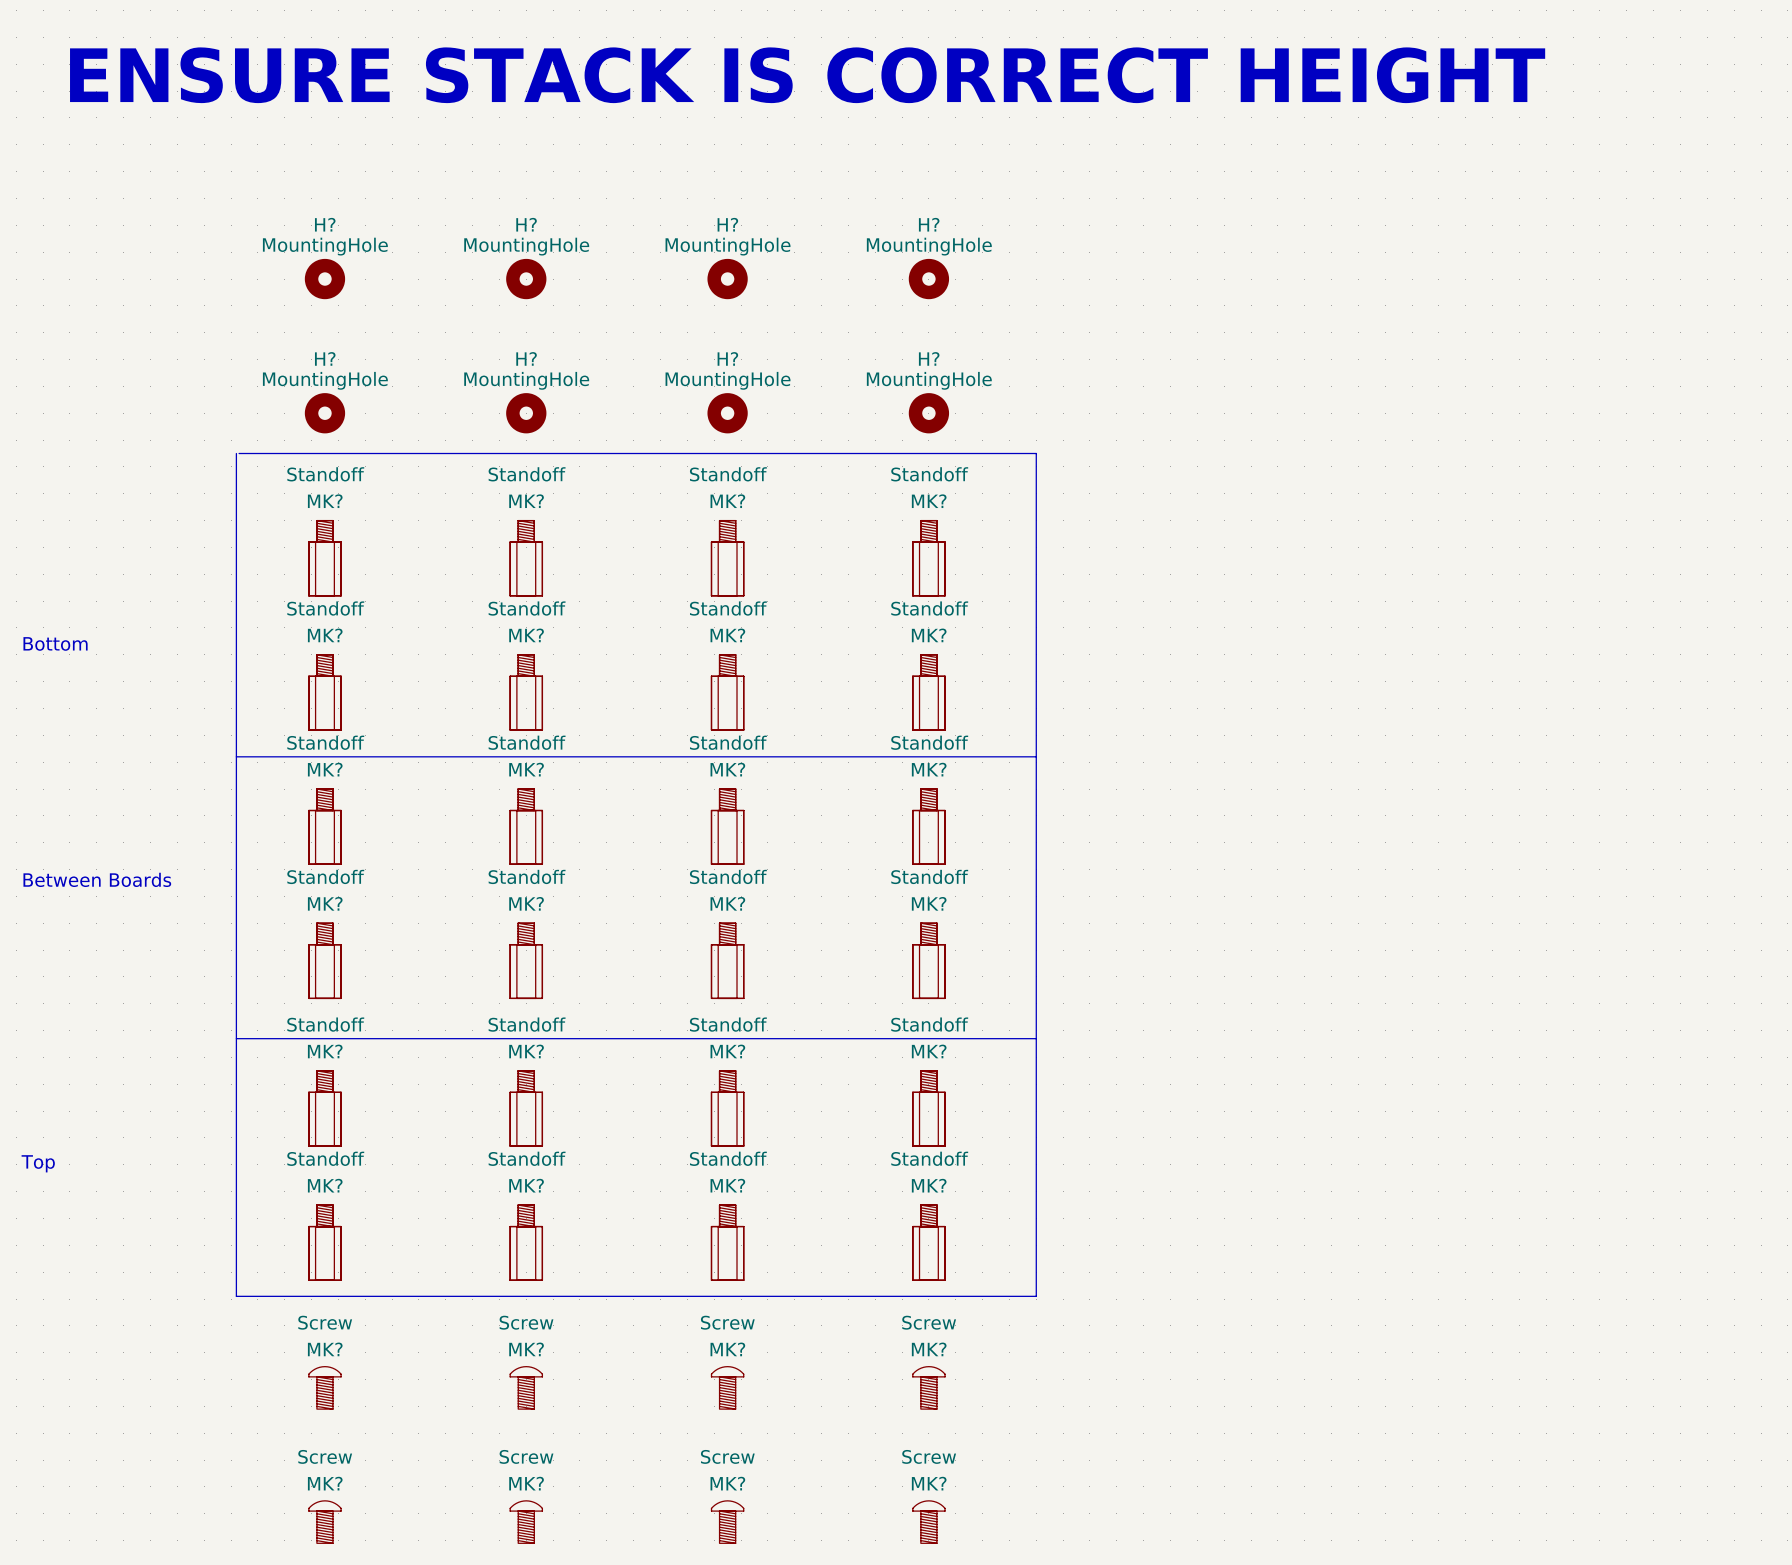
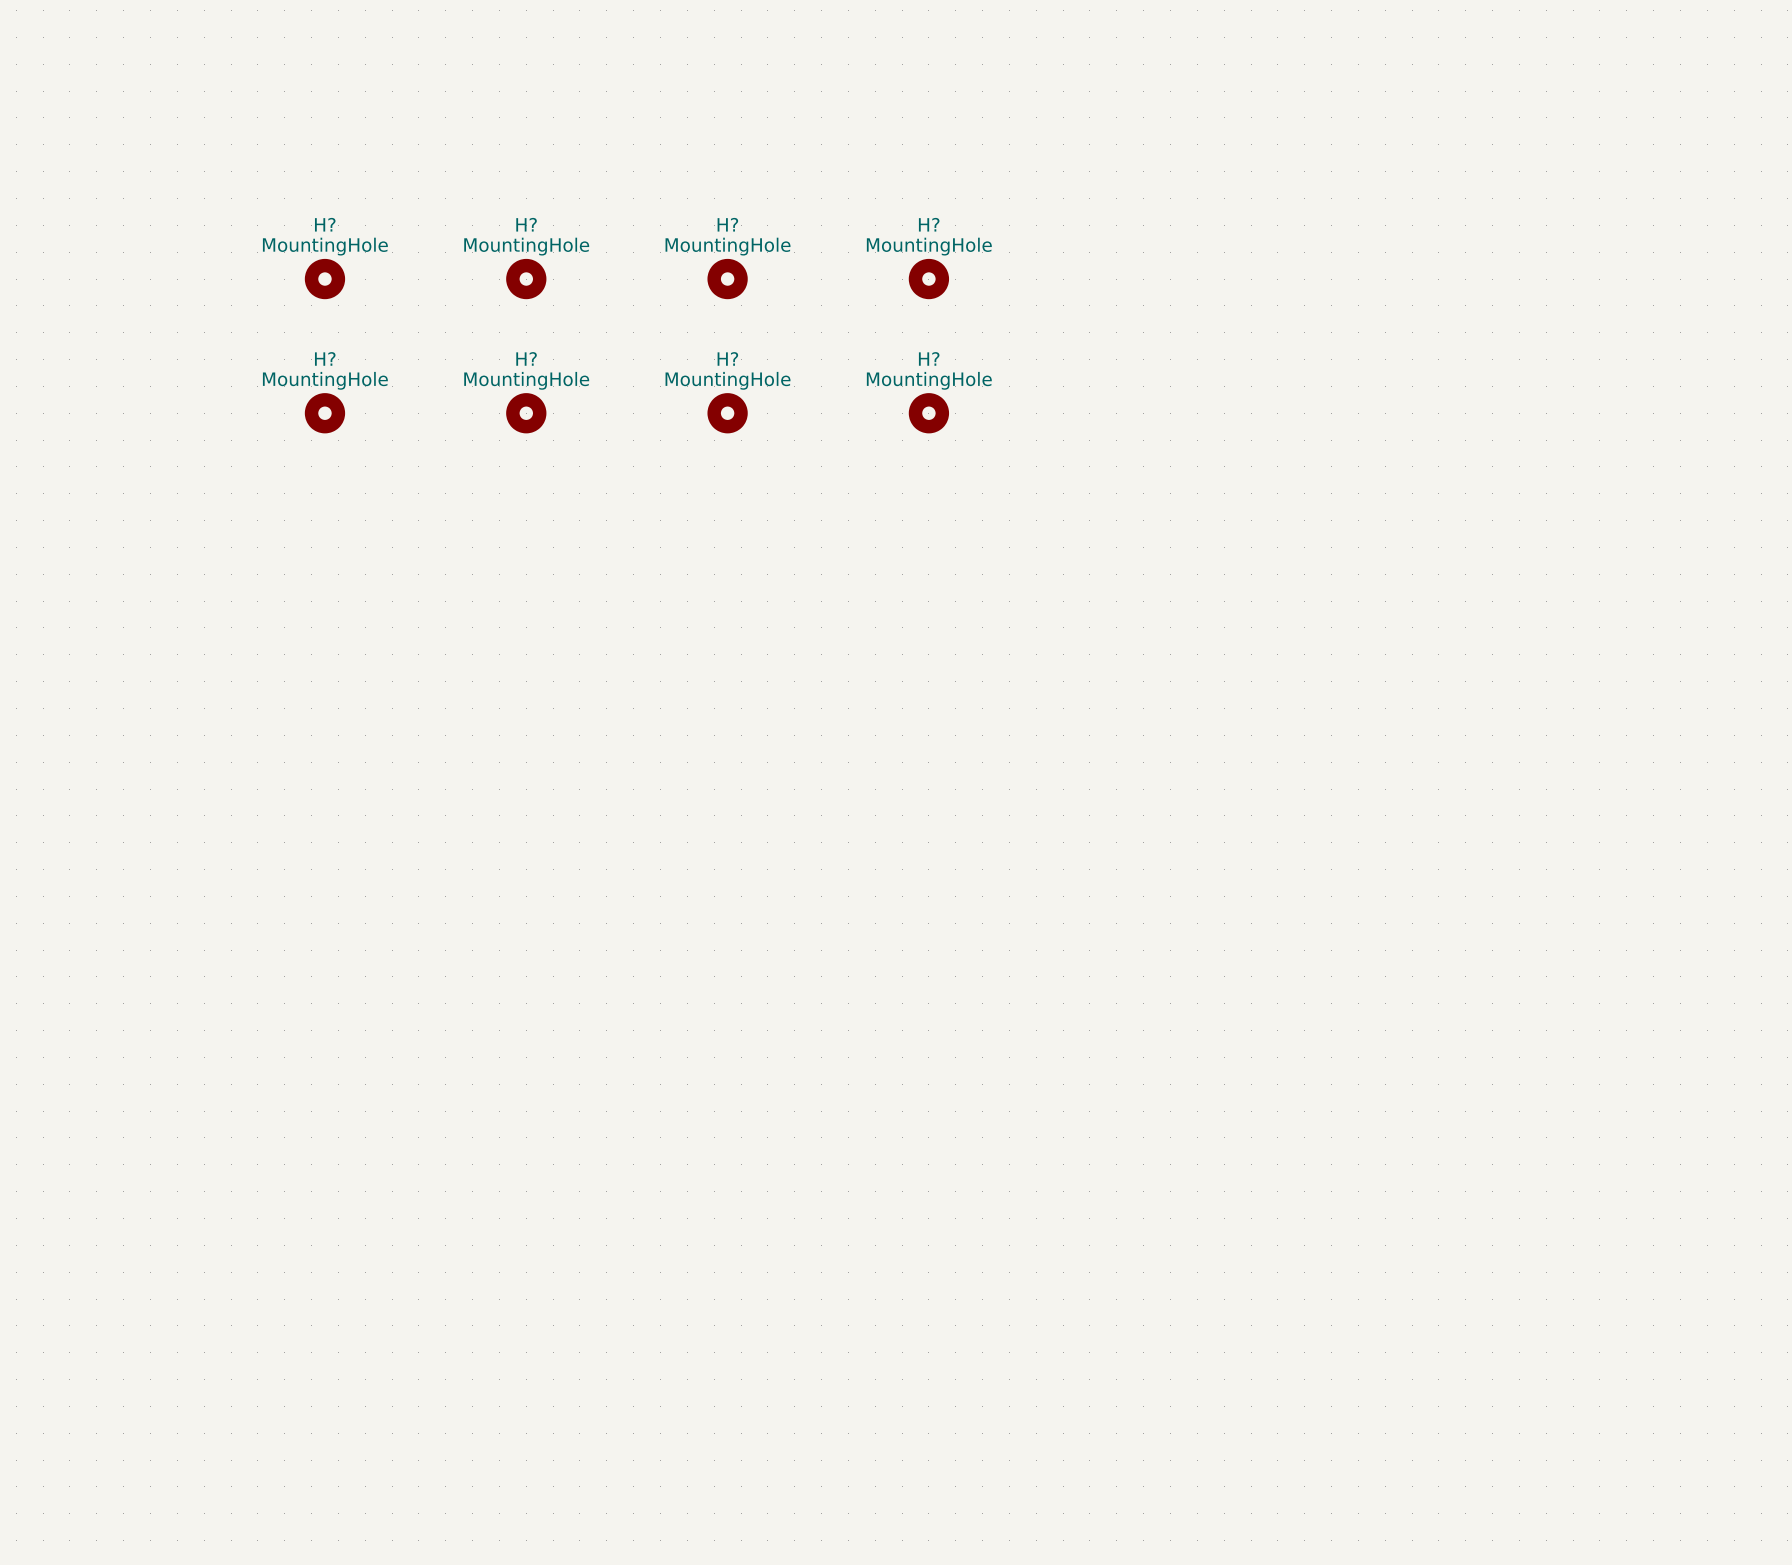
text: ENSURE STACK IS CORRECT HEIGHT (807, 75) -> none
line: (236, 453) (236, 1296) (1036, 1296) (1036, 453) (239, 453) -> none
MK?: Standoff (324, 558) -> none
MK?: Standoff (526, 558) -> none
MK?: Standoff (727, 558) -> none
MK?: Standoff (928, 558) -> none
text: Bottom (55, 643) -> none
MK?: Standoff (324, 692) -> none
MK?: Standoff (526, 692) -> none
MK?: Standoff (727, 692) -> none
MK?: Standoff (928, 692) -> none
line: (236, 756) (1036, 756) -> none
MK?: Standoff (324, 826) -> none
MK?: Standoff (526, 826) -> none
MK?: Standoff (727, 826) -> none
MK?: Standoff (928, 826) -> none
text: Between Boards (97, 879) -> none
MK?: Standoff (324, 960) -> none
MK?: Standoff (526, 960) -> none
MK?: Standoff (727, 960) -> none
MK?: Standoff (928, 960) -> none
line: (236, 1038) (1036, 1038) -> none
MK?: Standoff (324, 1108) -> none
MK?: Standoff (526, 1108) -> none
MK?: Standoff (727, 1108) -> none
MK?: Standoff (928, 1108) -> none
text: Top (38, 1163) -> none
MK?: Standoff (324, 1242) -> none
MK?: Standoff (526, 1242) -> none
MK?: Standoff (727, 1242) -> none
MK?: Standoff (928, 1242) -> none
MK?: Screw (324, 1387) -> none
MK?: Screw (526, 1387) -> none
MK?: Screw (727, 1387) -> none
MK?: Screw (928, 1387) -> none
MK?: Screw (324, 1522) -> none
MK?: Screw (526, 1522) -> none
MK?: Screw (727, 1522) -> none
MK?: Screw (928, 1522) -> none

